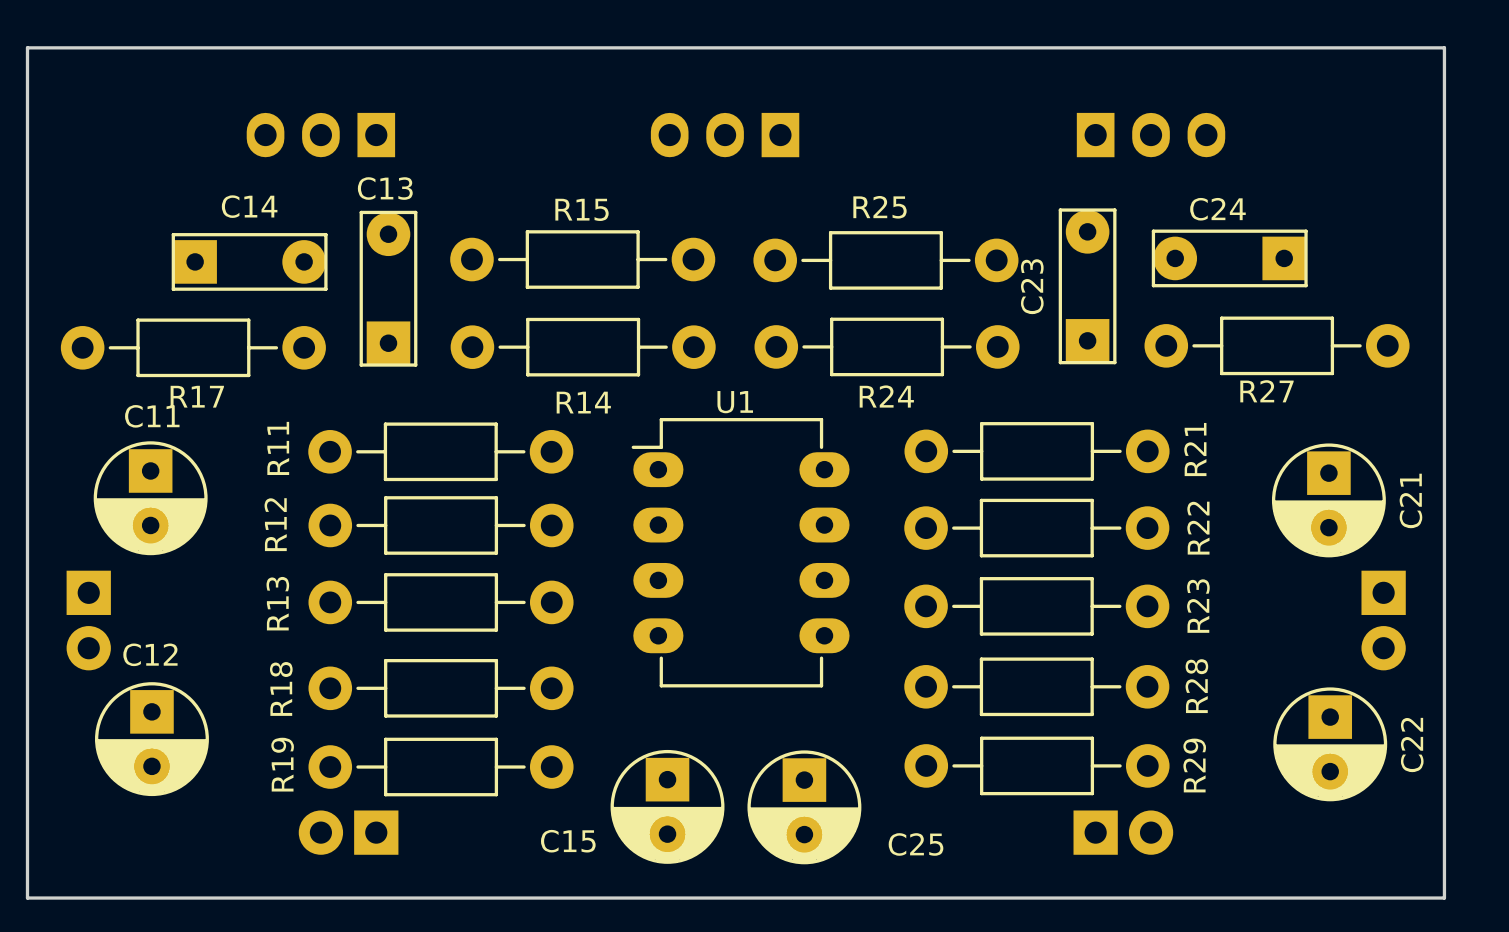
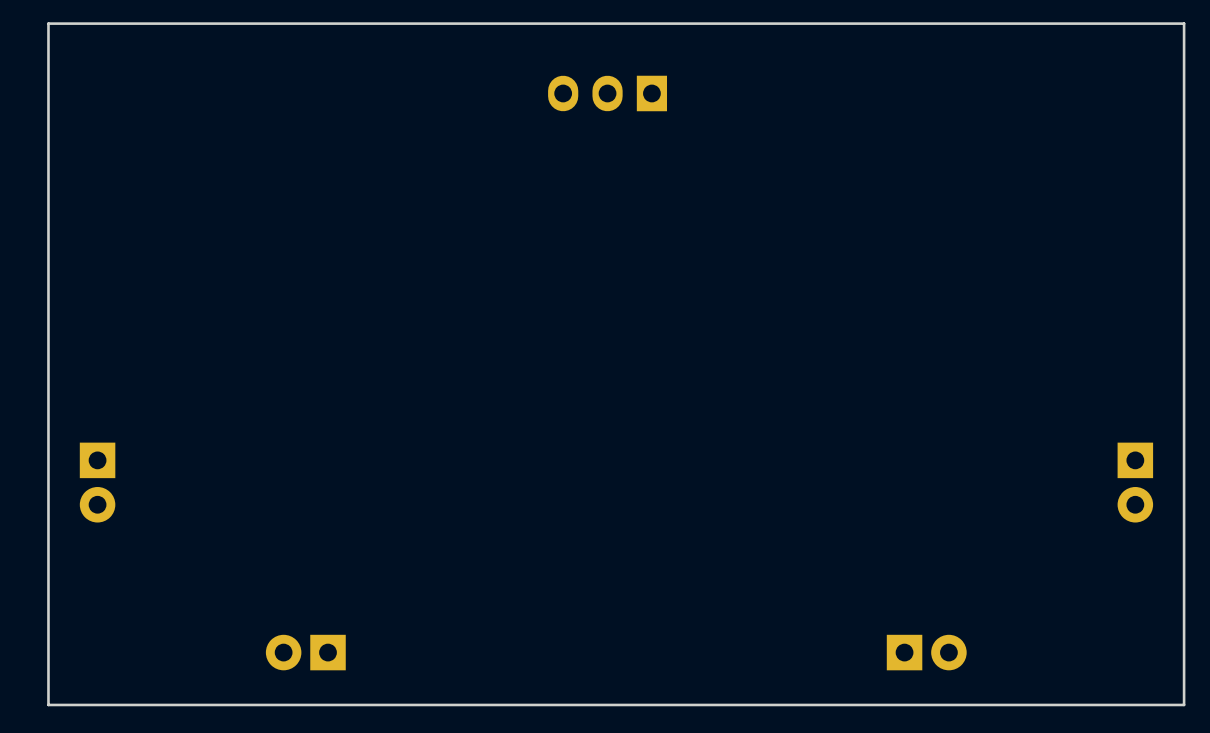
part: (320, 135) -> none
part: (1151, 135) -> none
C24: (1229, 258) -> none
R15: (582, 259) -> none
R25: (885, 260) -> none
C14: (249, 261) -> none
C23: (1087, 286) -> none
C13: (388, 288) -> none
R27: (1277, 345) -> none
R24: (887, 346) -> none
R17: (193, 347) -> none
R14: (583, 347) -> none
R11: (440, 451) -> none
R21: (1037, 451) -> none
C11: (150, 498) -> none
C21: (1328, 500) -> none
R12: (441, 525) -> none
R22: (1036, 528) -> none
U1: (740, 552) -> none
R13: (441, 602) -> none
R23: (1036, 606) -> none
R28: (1036, 686) -> none
R18: (441, 688) -> none
C12: (151, 739) -> none
C22: (1330, 744) -> none
R29: (1037, 765) -> none
R19: (441, 767) -> none
C15: (667, 806) -> none
C25: (804, 807) -> none

